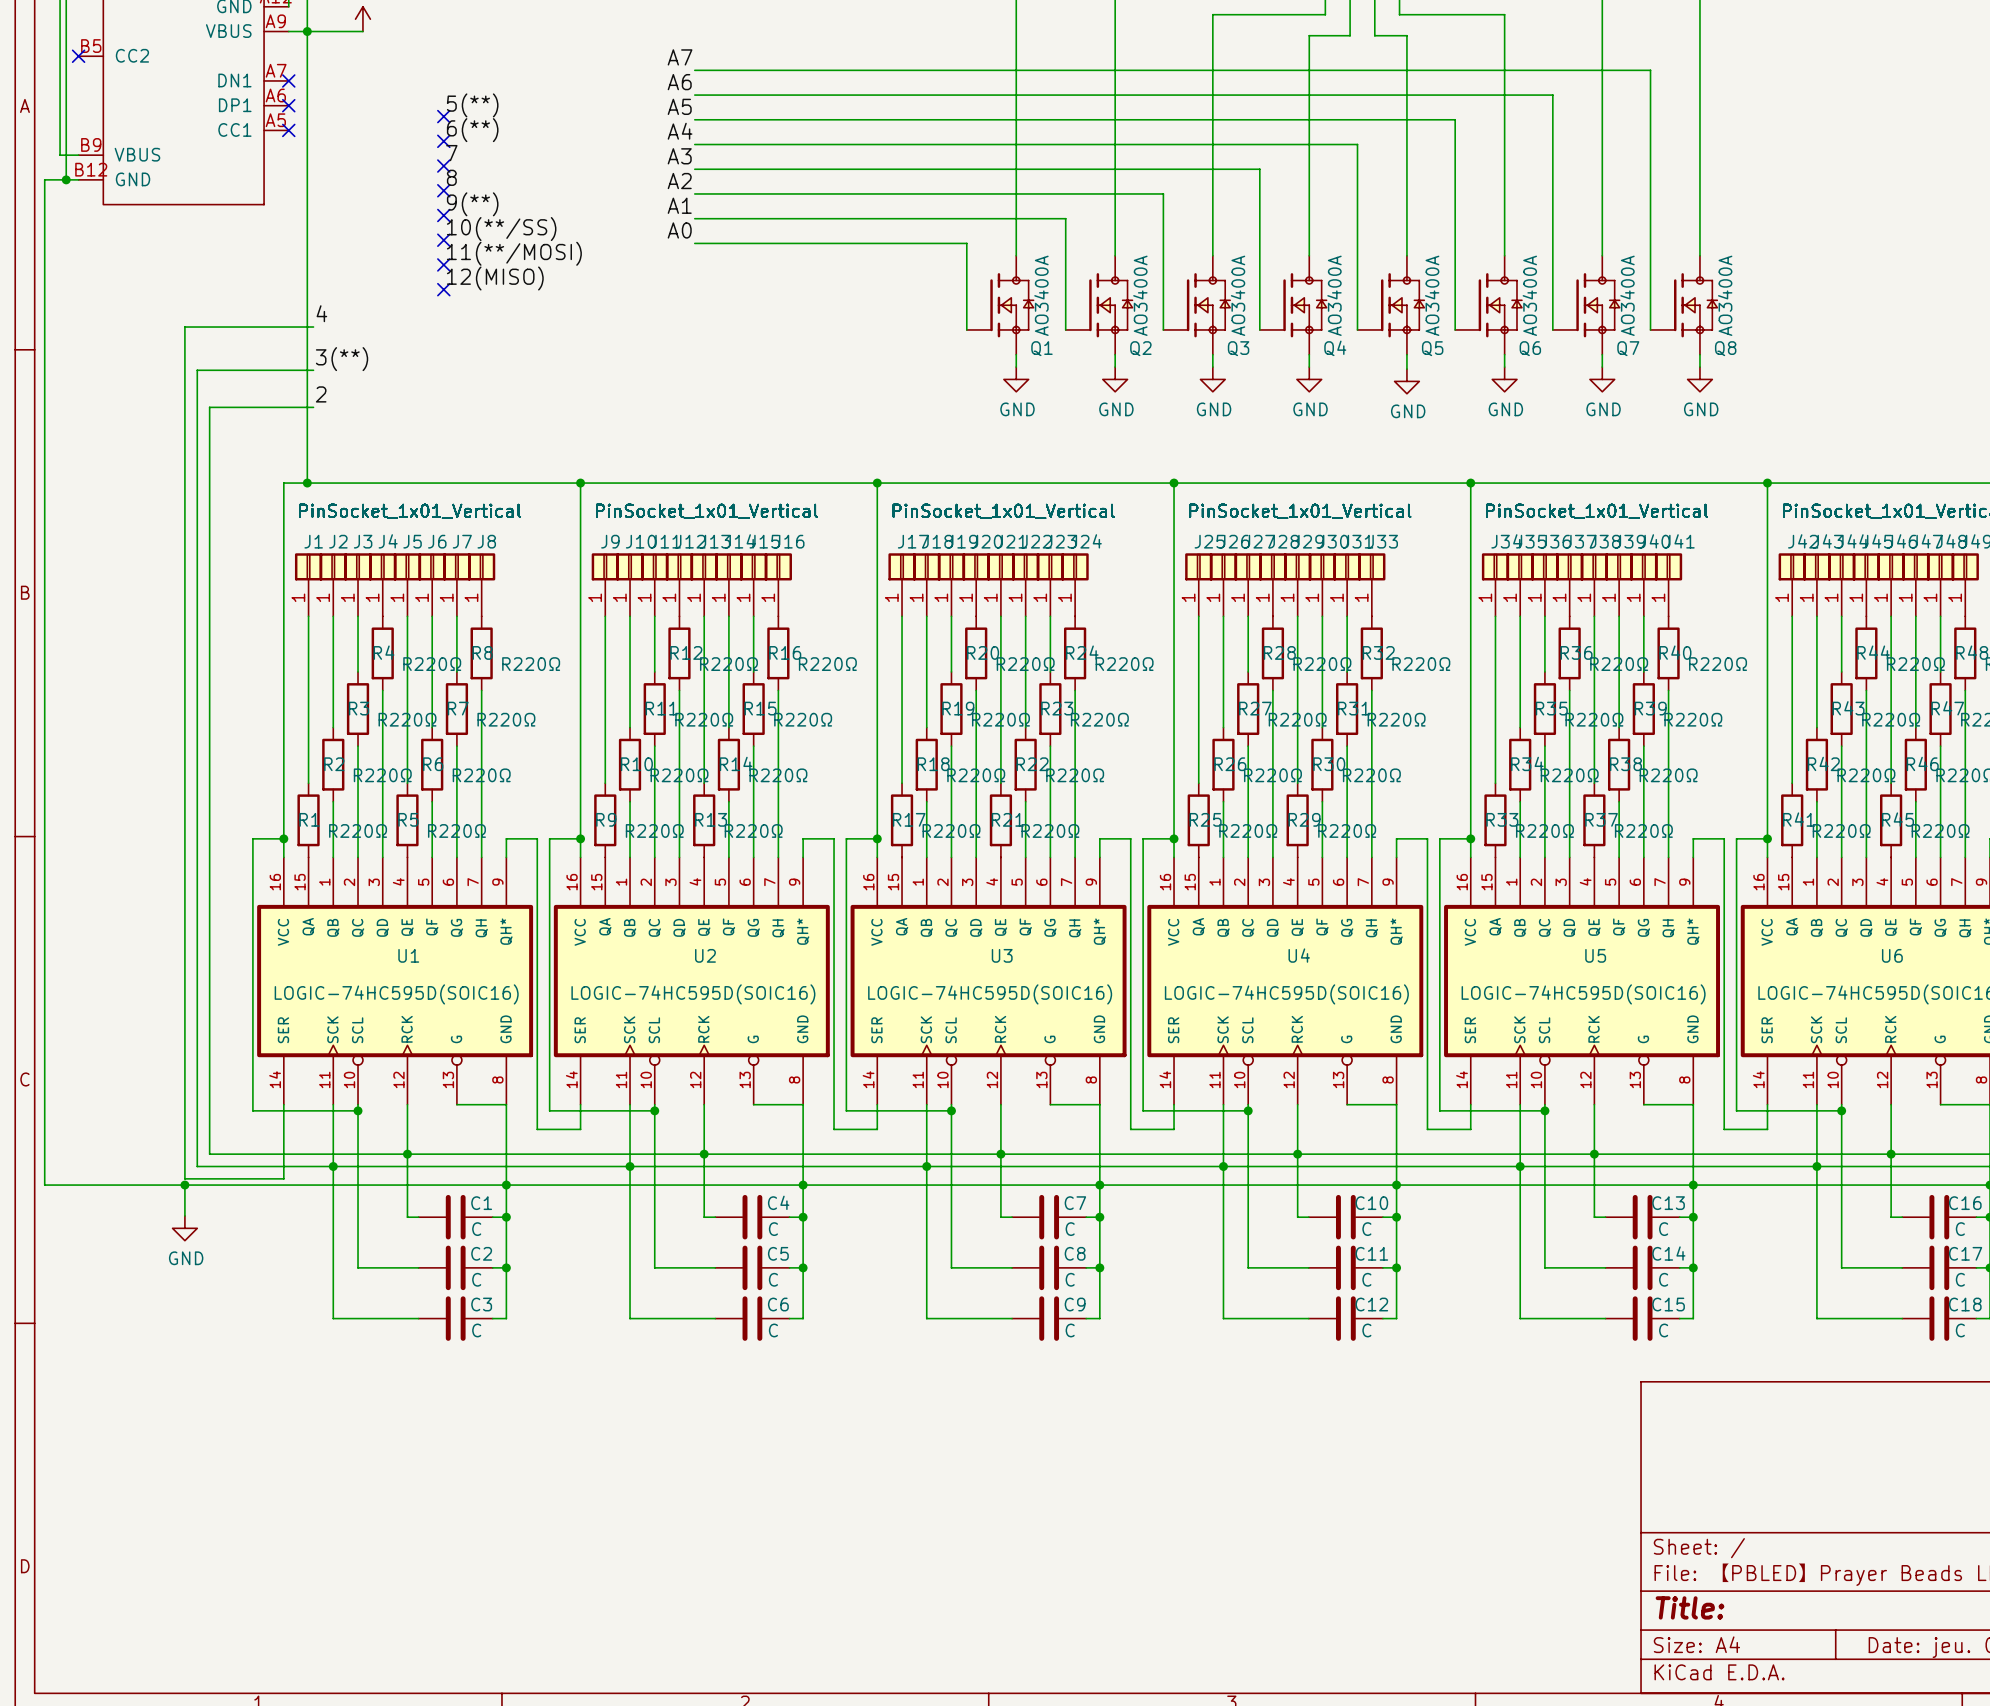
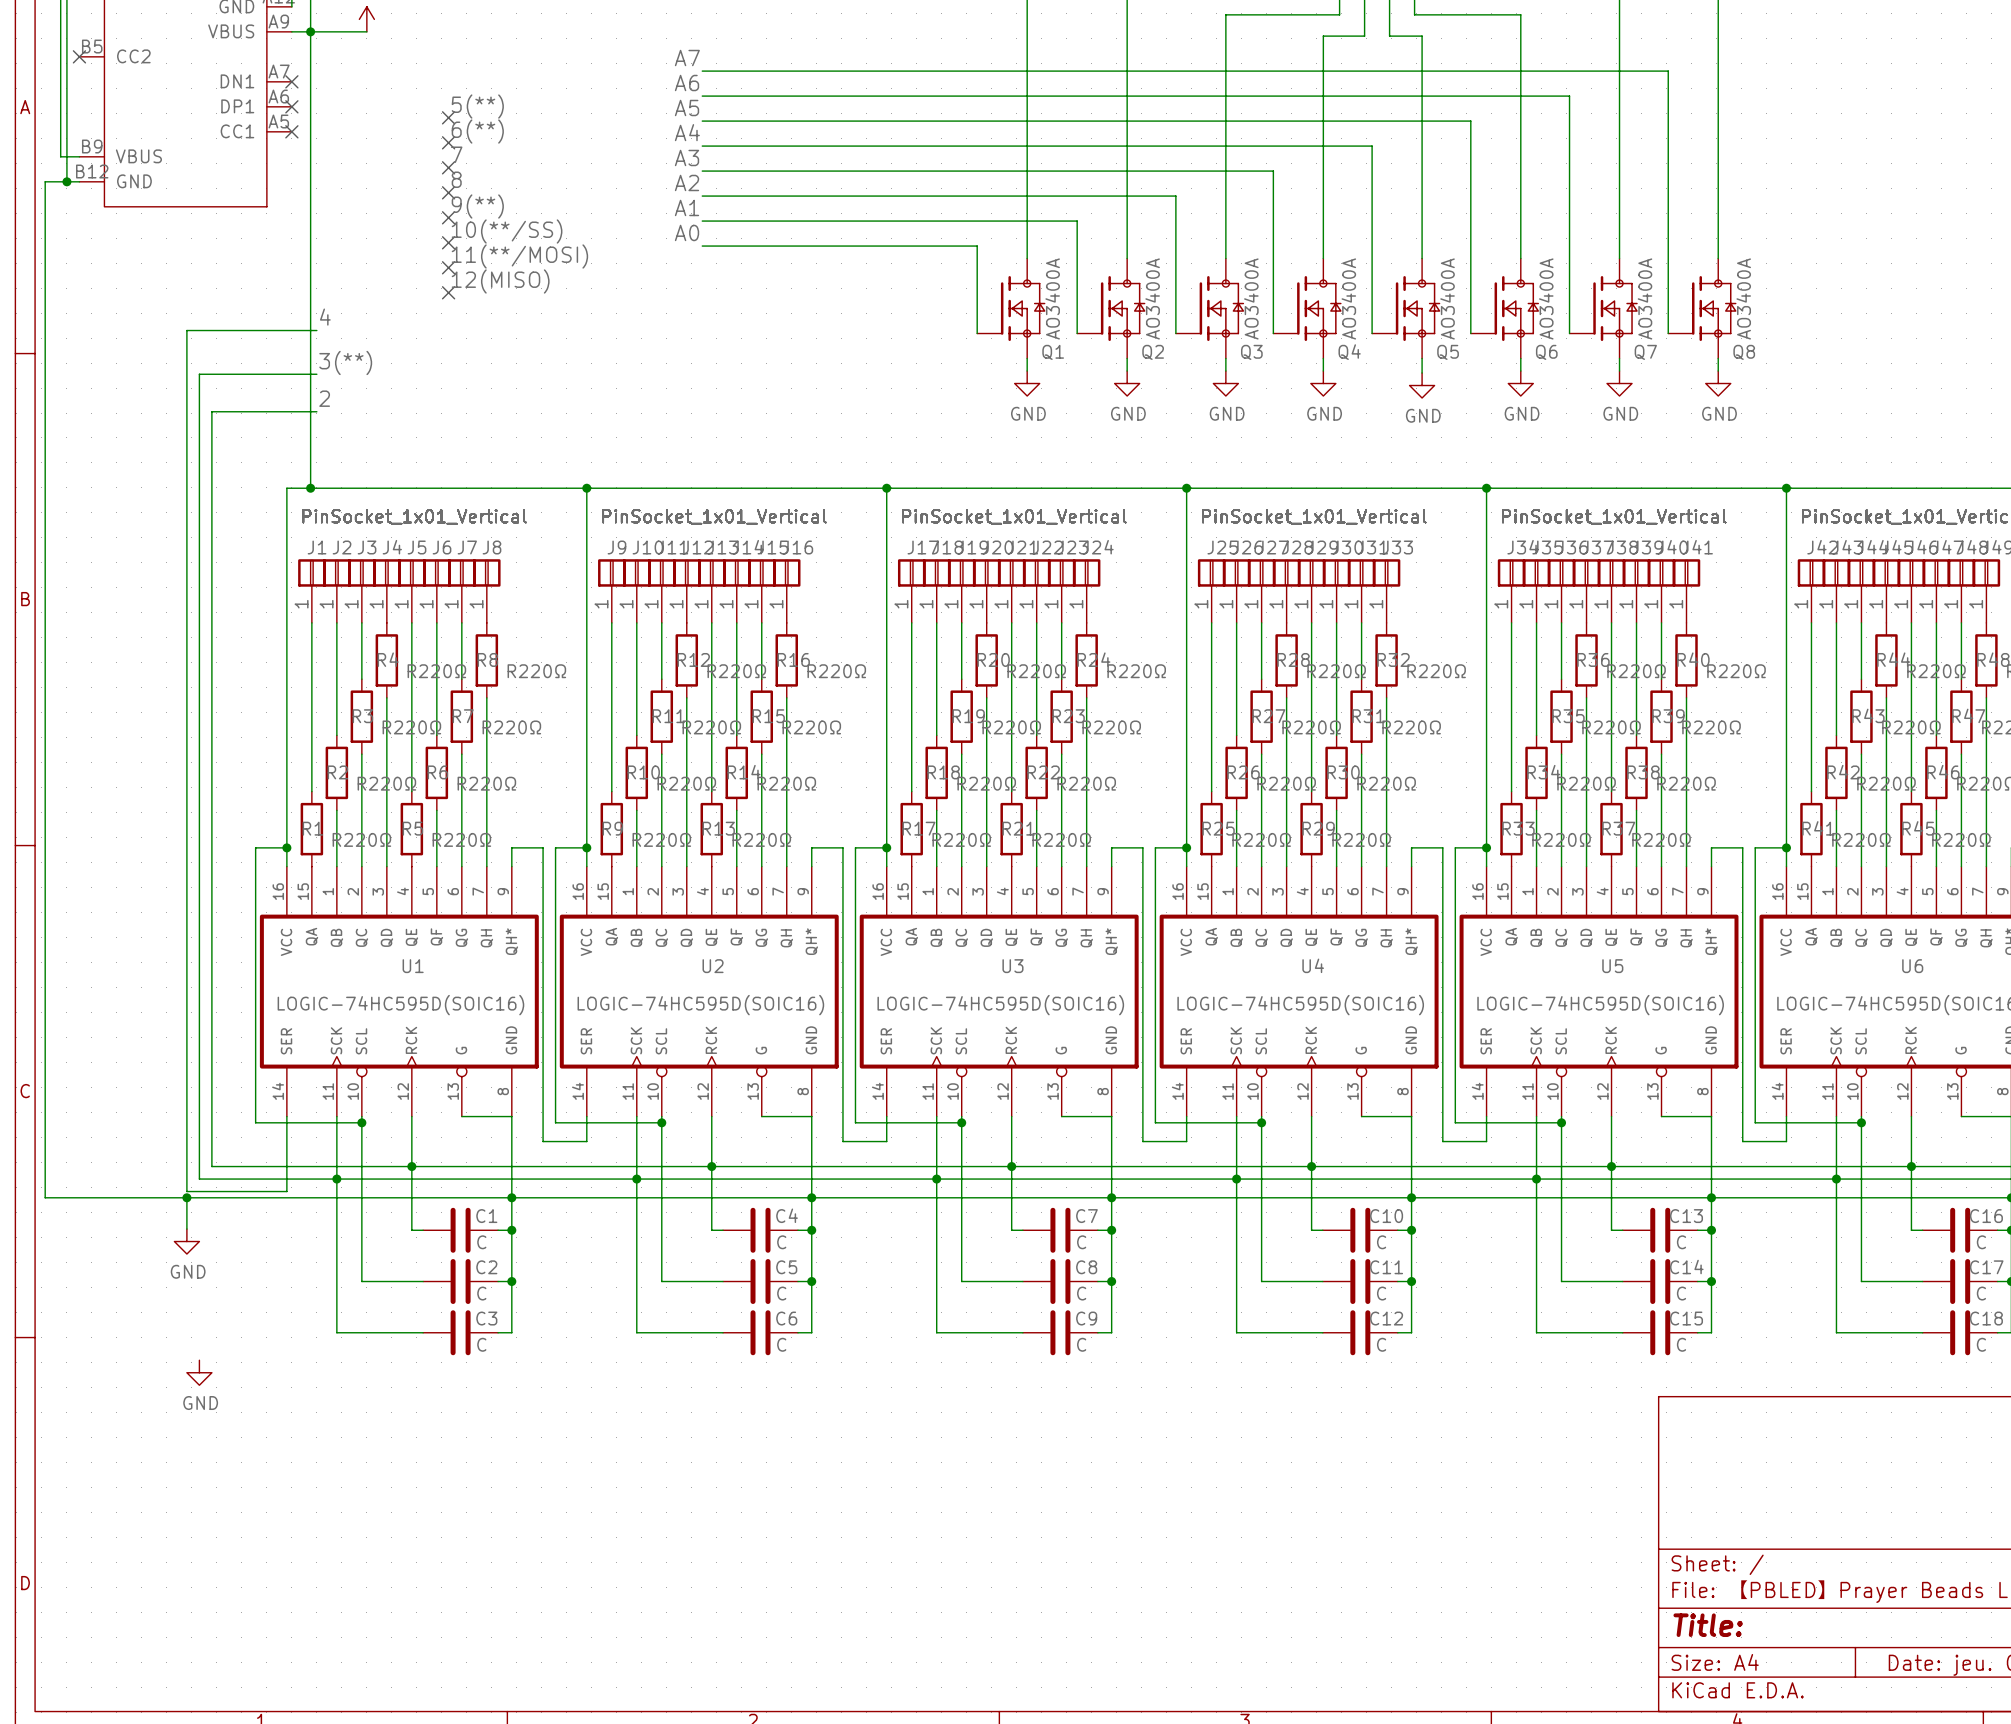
power symbol: none -> GND (199, 1372)

